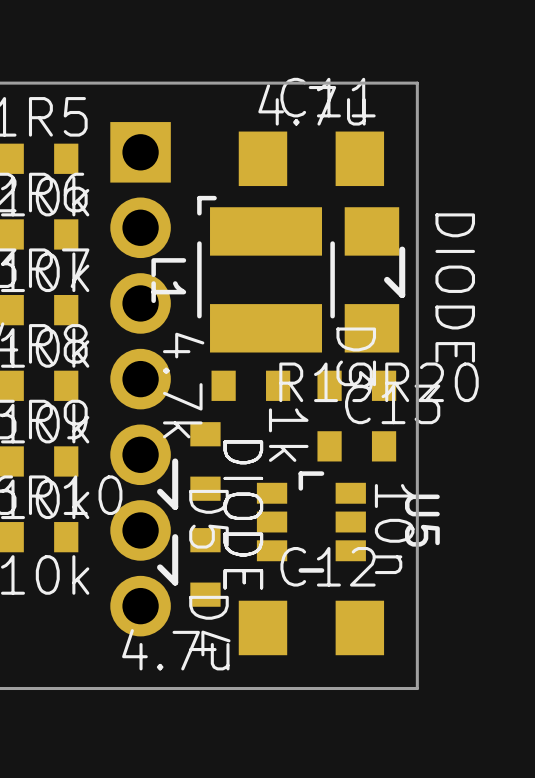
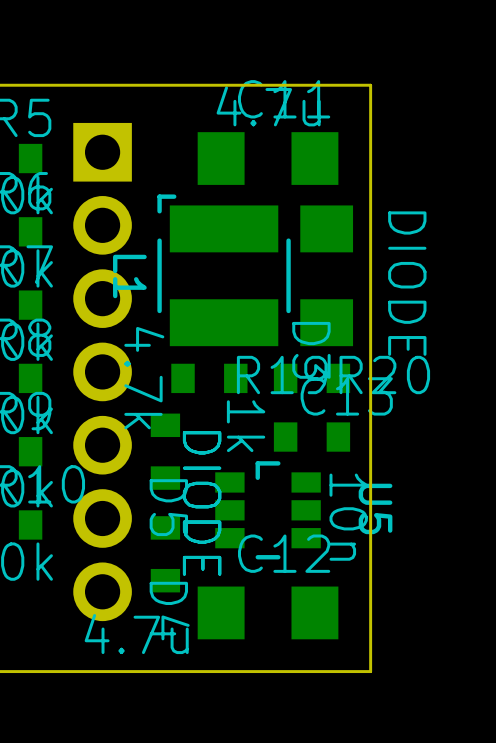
line: (402, 249) (402, 295) (387, 279) -> none
line: (175, 461) (175, 506) (160, 491) -> none
line: (175, 537) (175, 582) (160, 567) -> none

